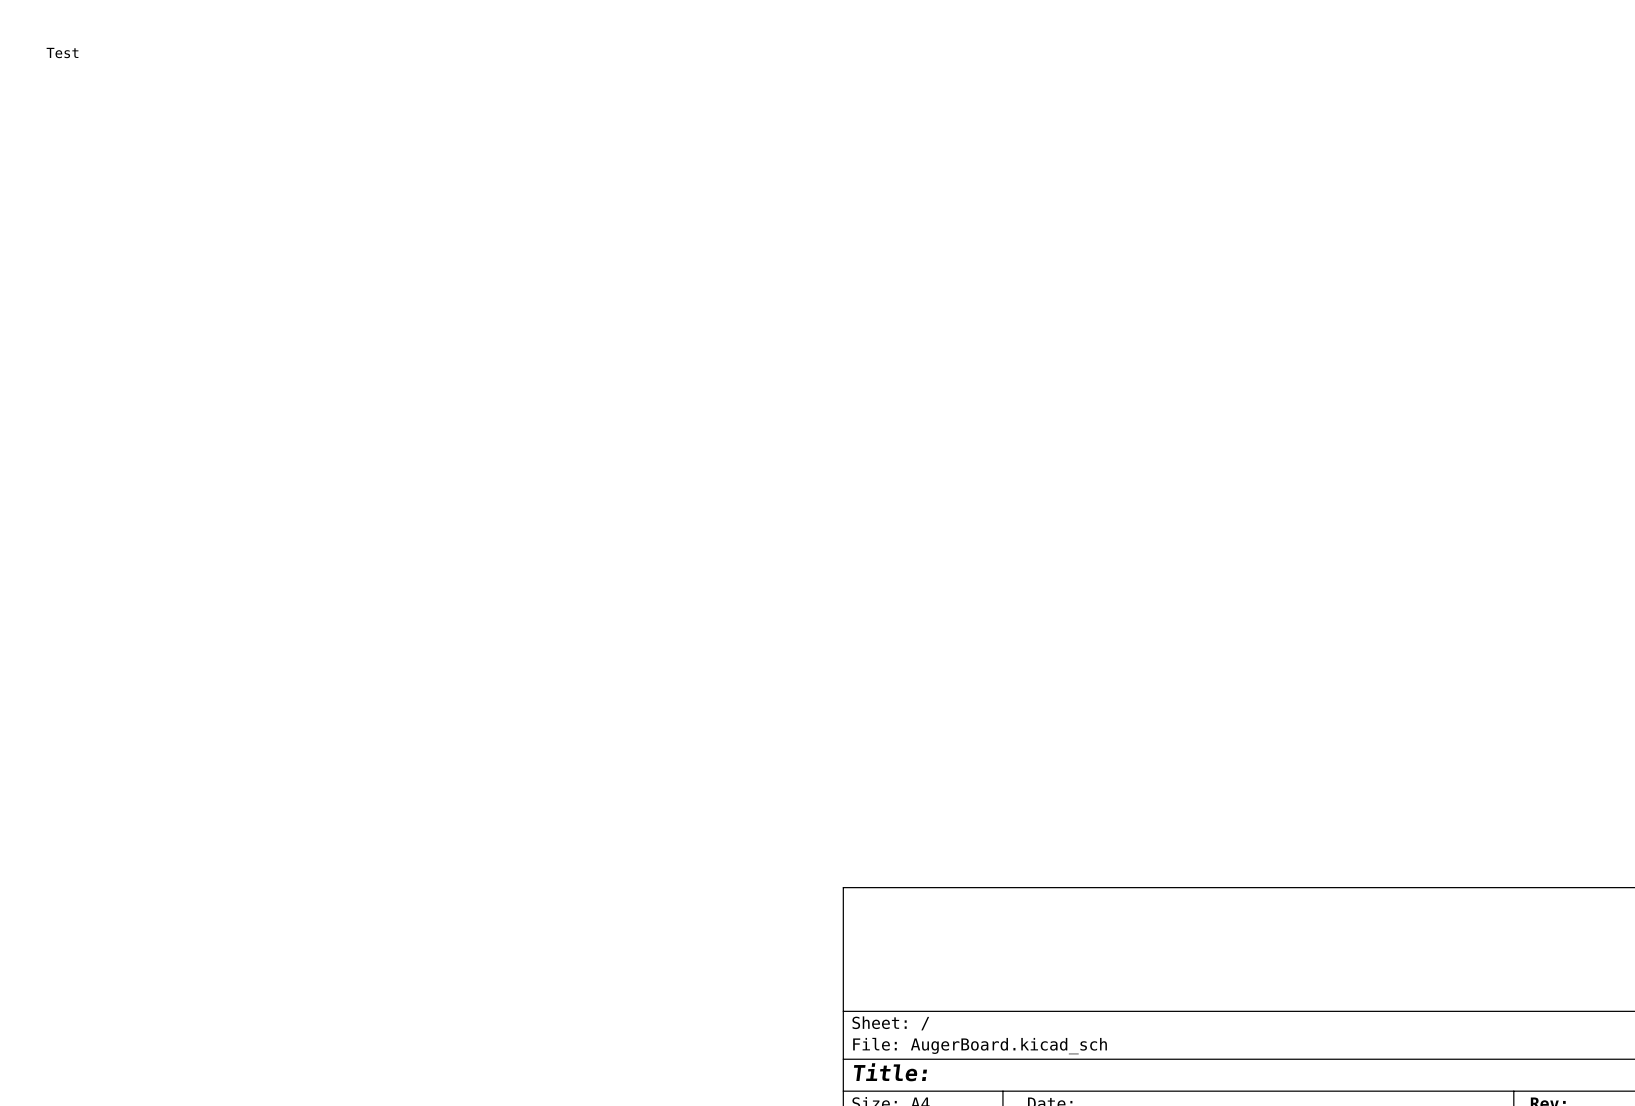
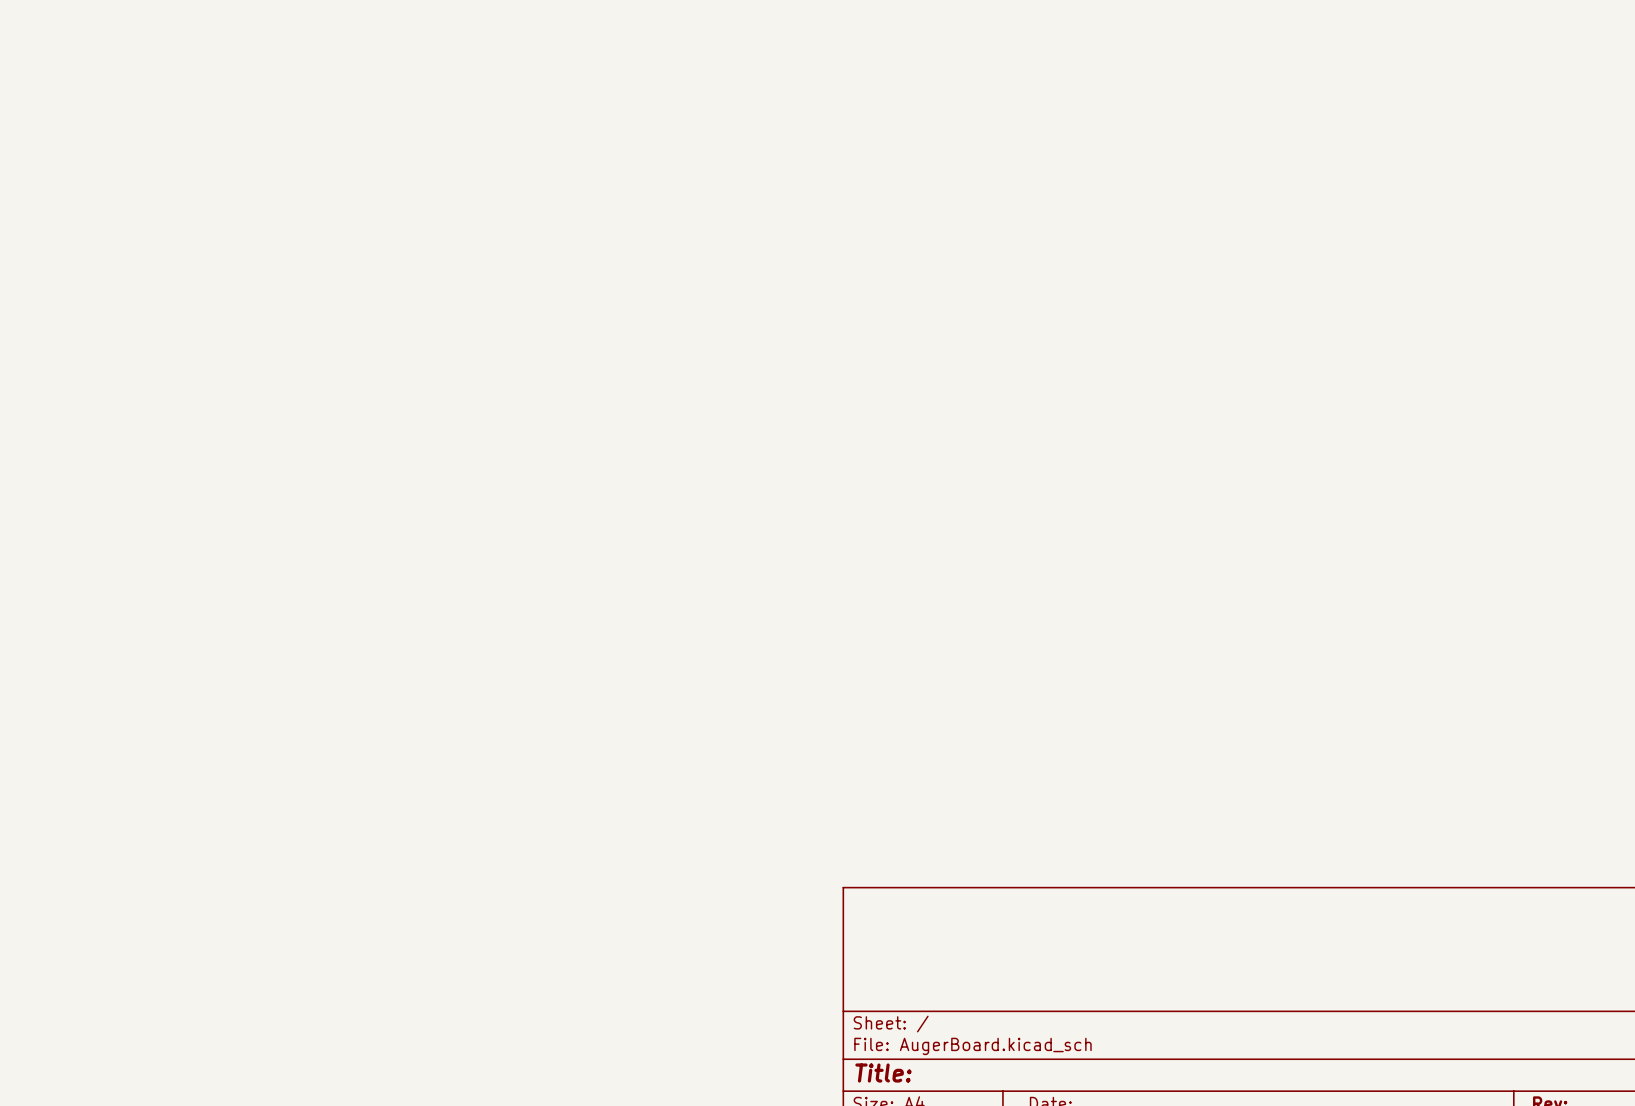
text: Test (62, 53) -> none

